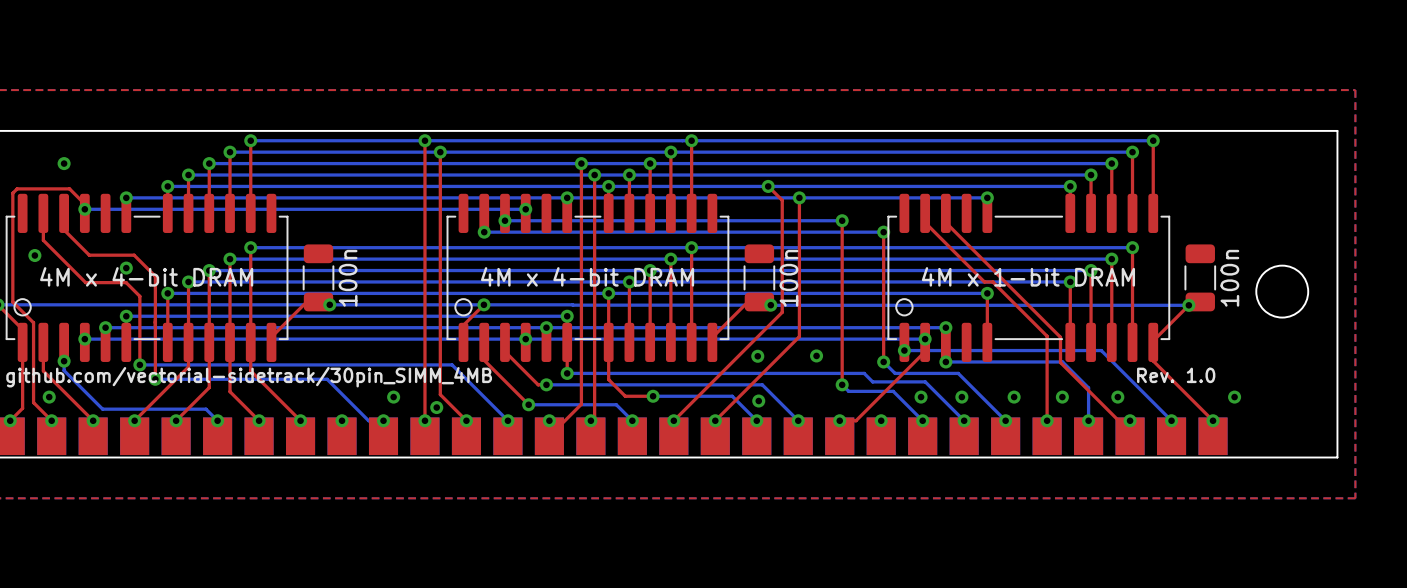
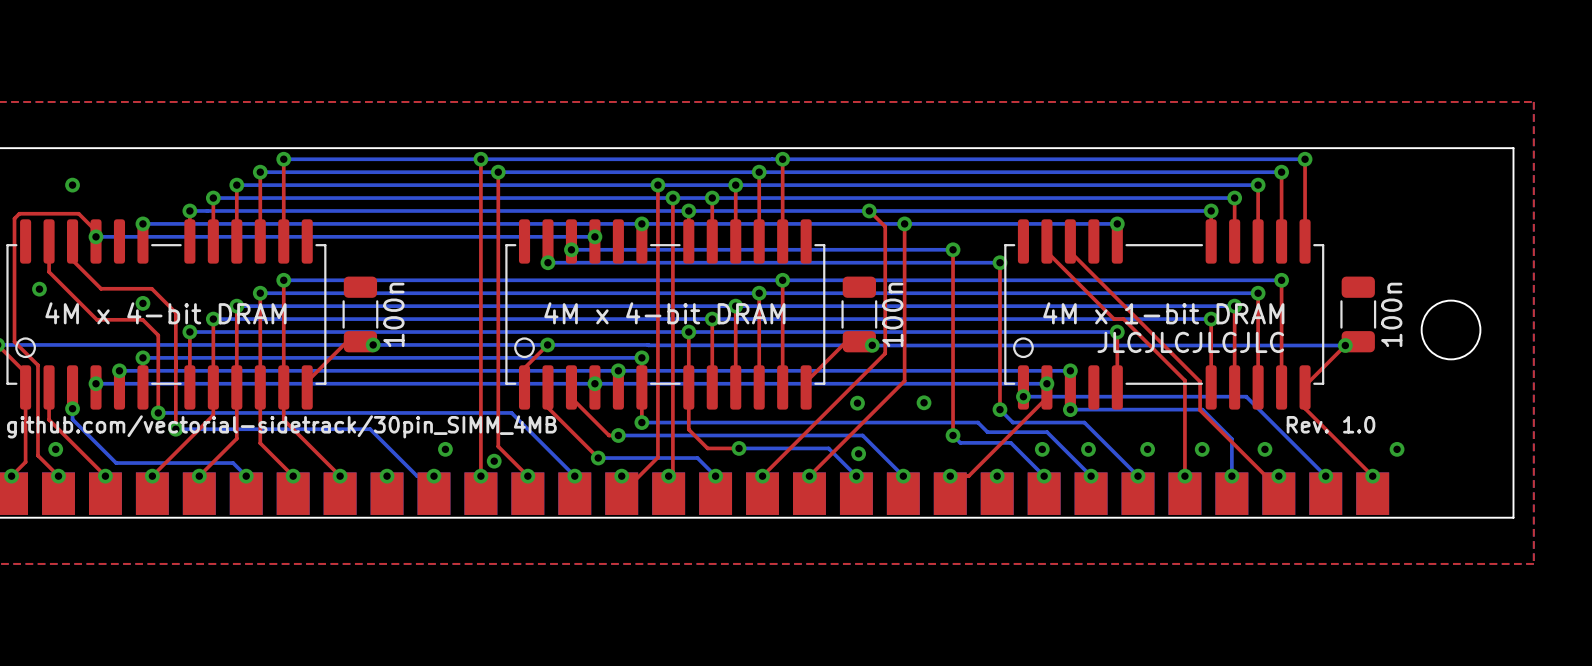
text: none -> JLCJLCJLCJLC (1190, 342)

